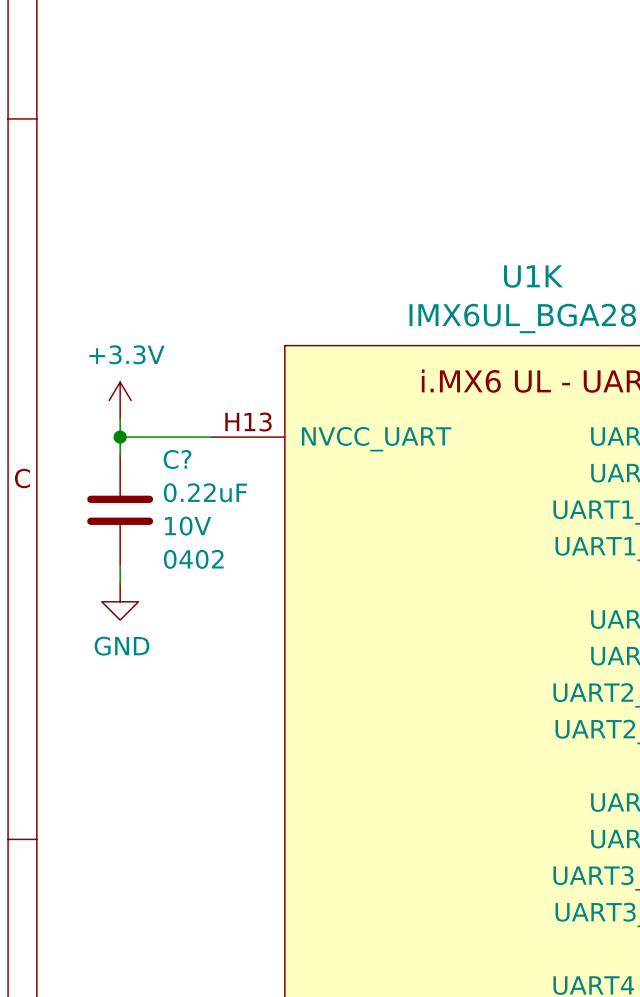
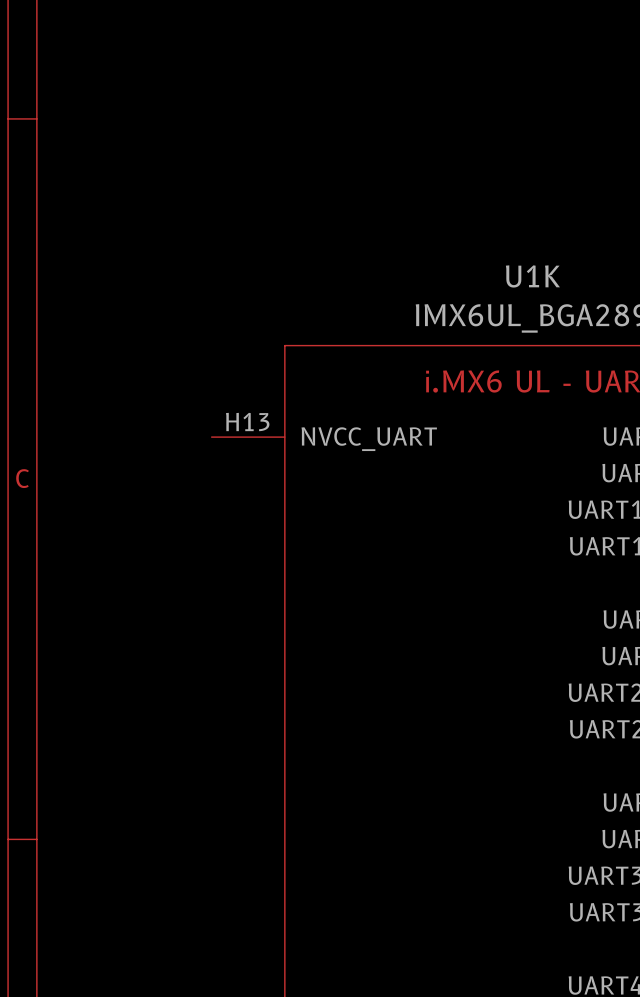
power symbol: +3.3V (120, 400) -> none
wire: (120, 418) (120, 455) -> none
wire: (120, 437) (211, 437) -> none
junction: (120, 437) -> none
C?: 0.22uF (120, 510) -> none
wire: (120, 565) (120, 583) -> none
power symbol: GND (120, 601) -> none

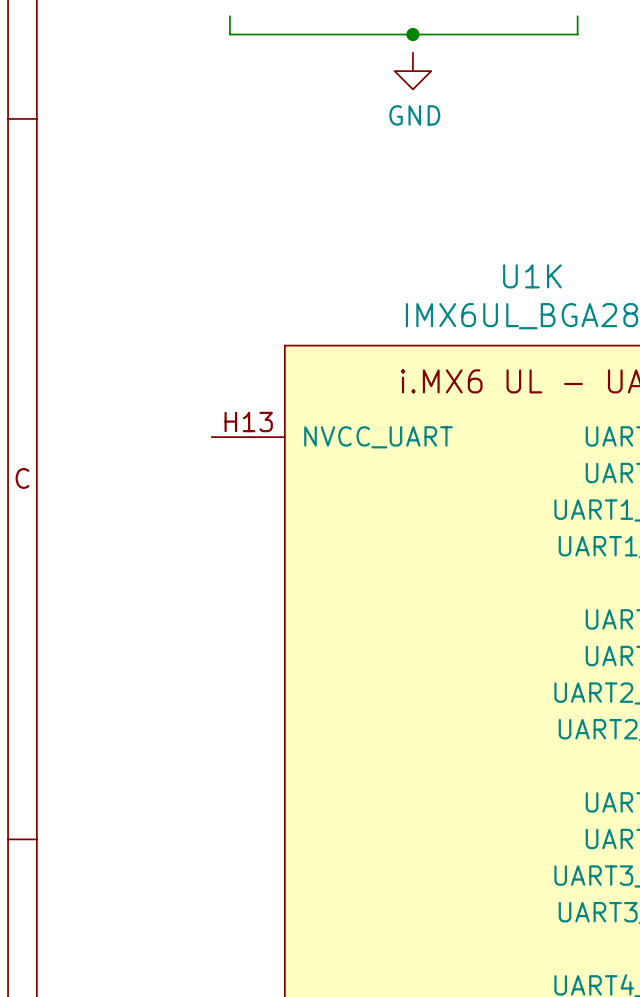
wire: none -> (229, 16) (229, 34) (577, 34) (577, 16)
junction: none -> (412, 34)
power symbol: none -> GND (412, 71)

